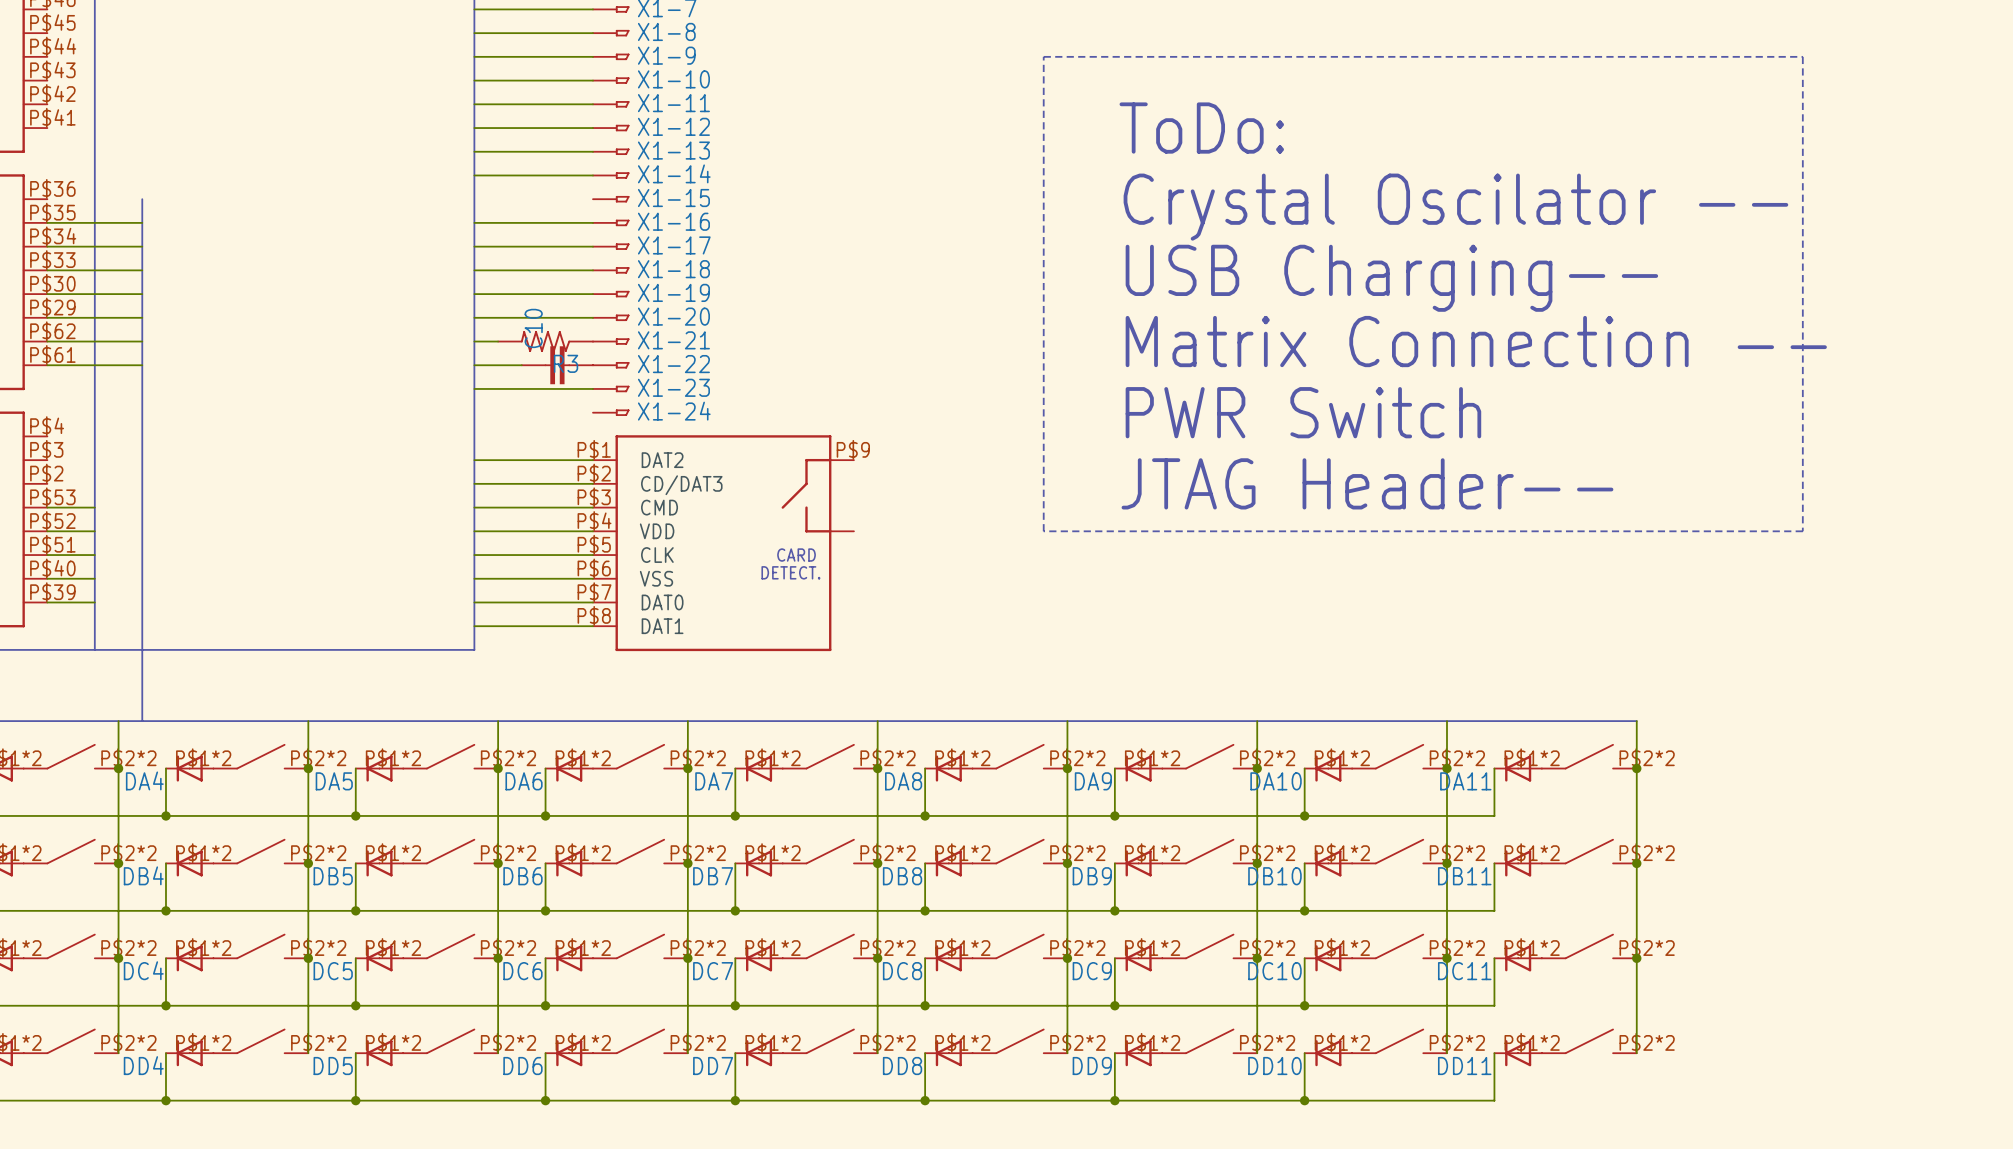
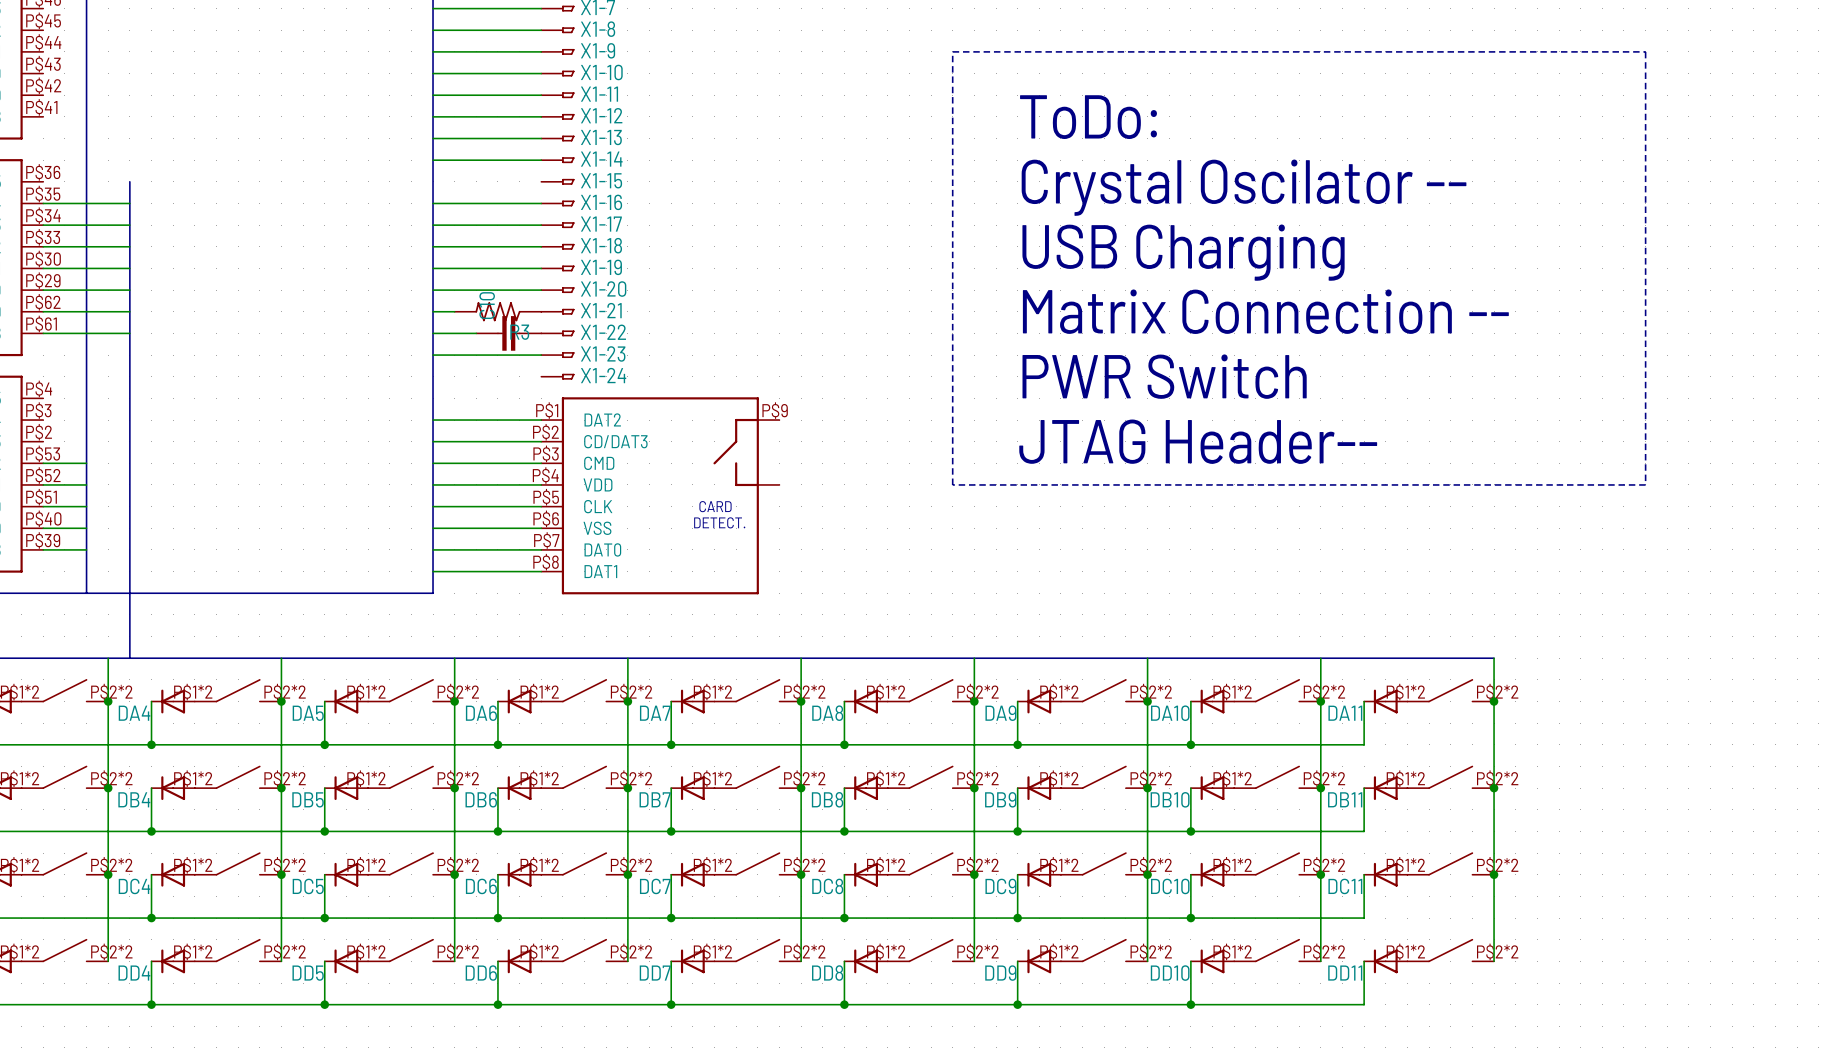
text: USB Charging-- (1391, 278) -> USB Charging (1183, 252)

